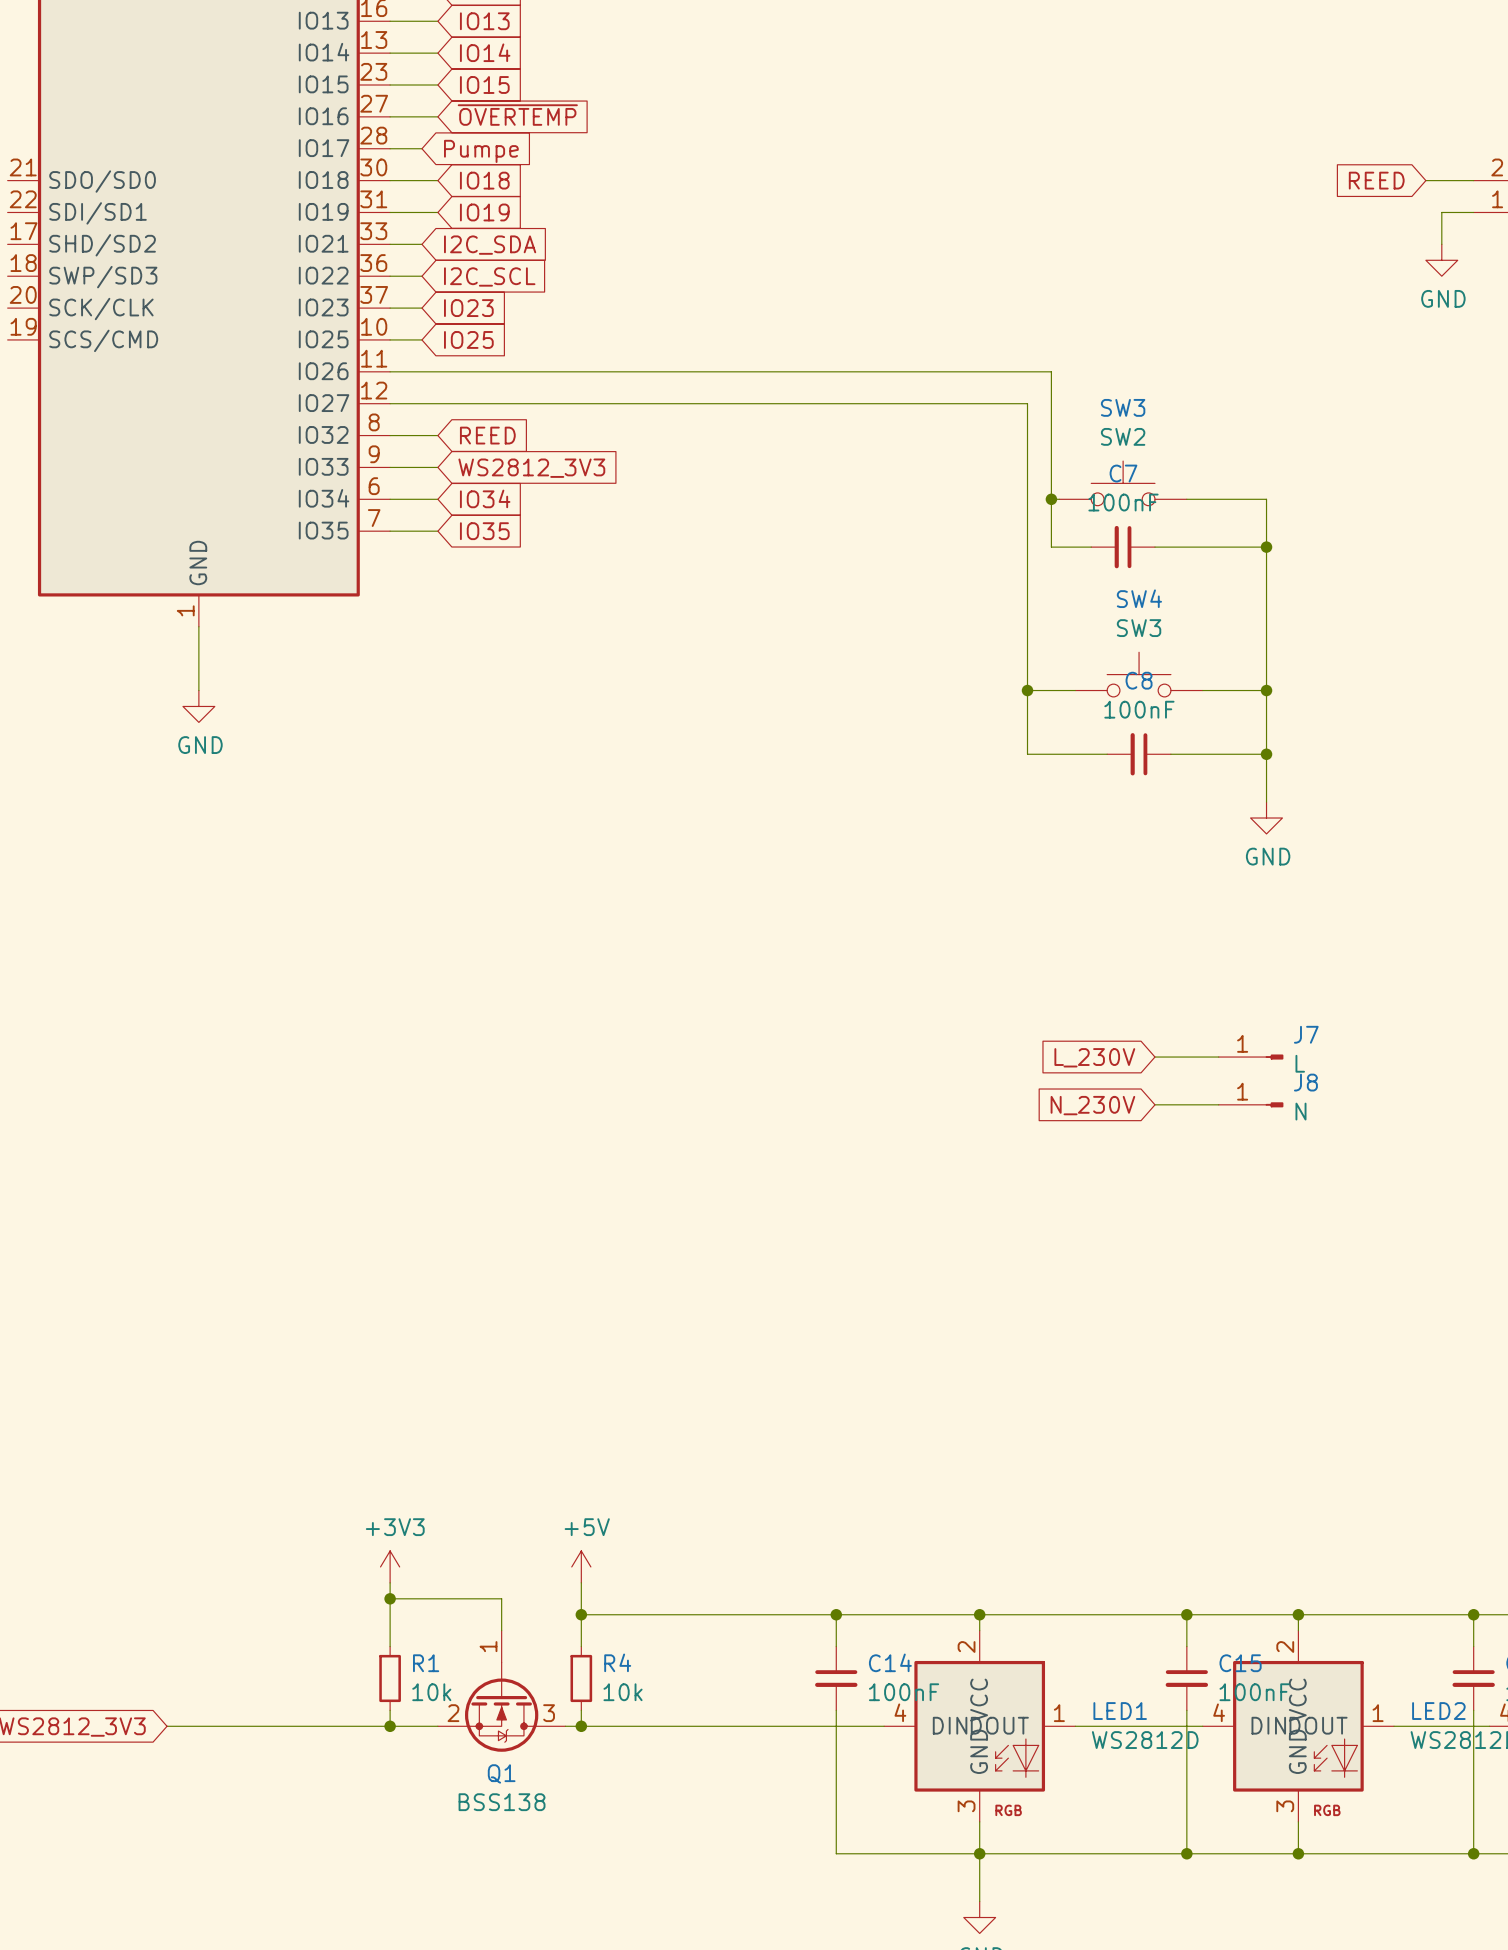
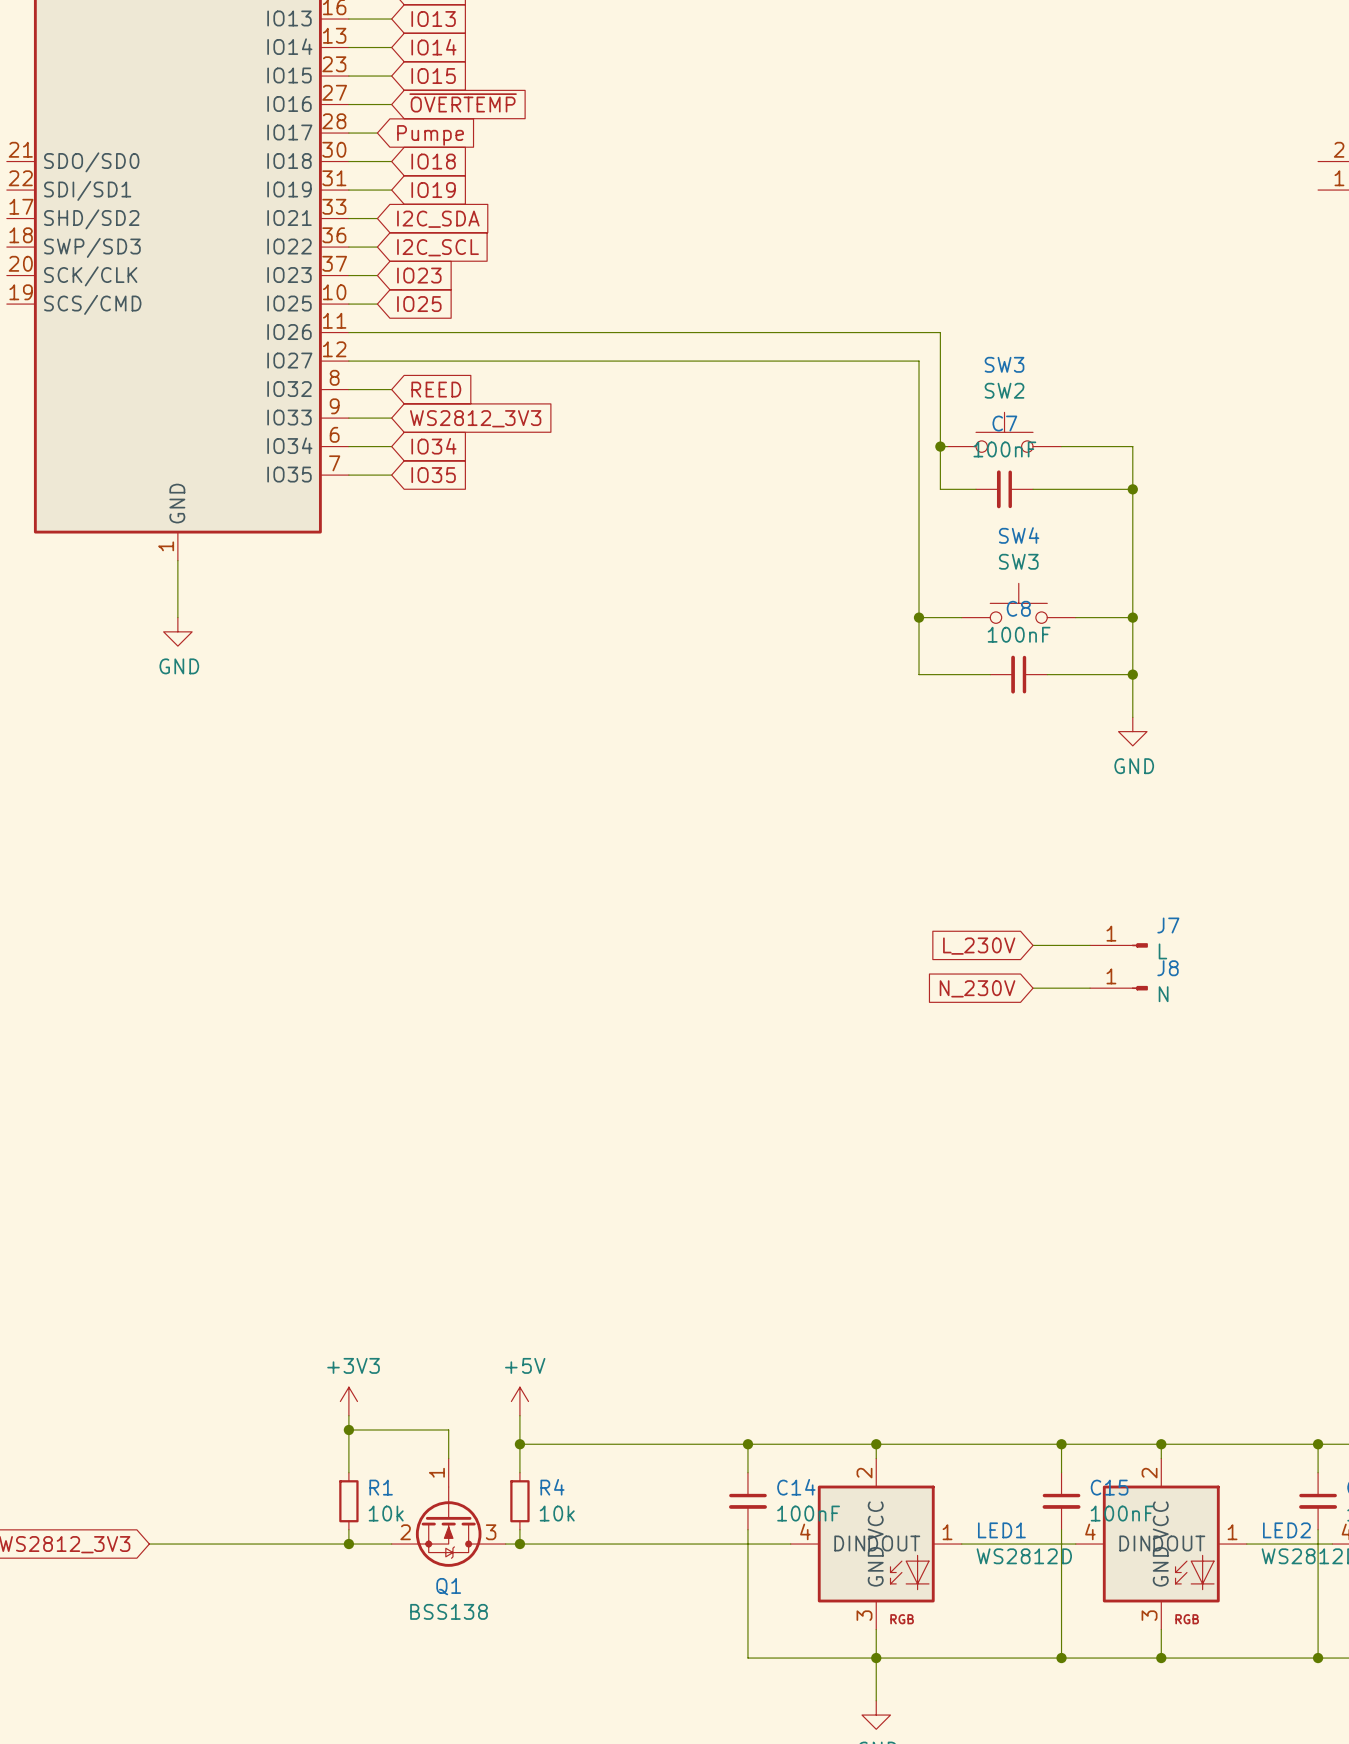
global label: REED (1376, 180) -> none
wire: (1425, 180) (1473, 180) -> none
wire: (1473, 212) (1441, 212) (1441, 244) -> none
power symbol: GND (1441, 260) -> none

